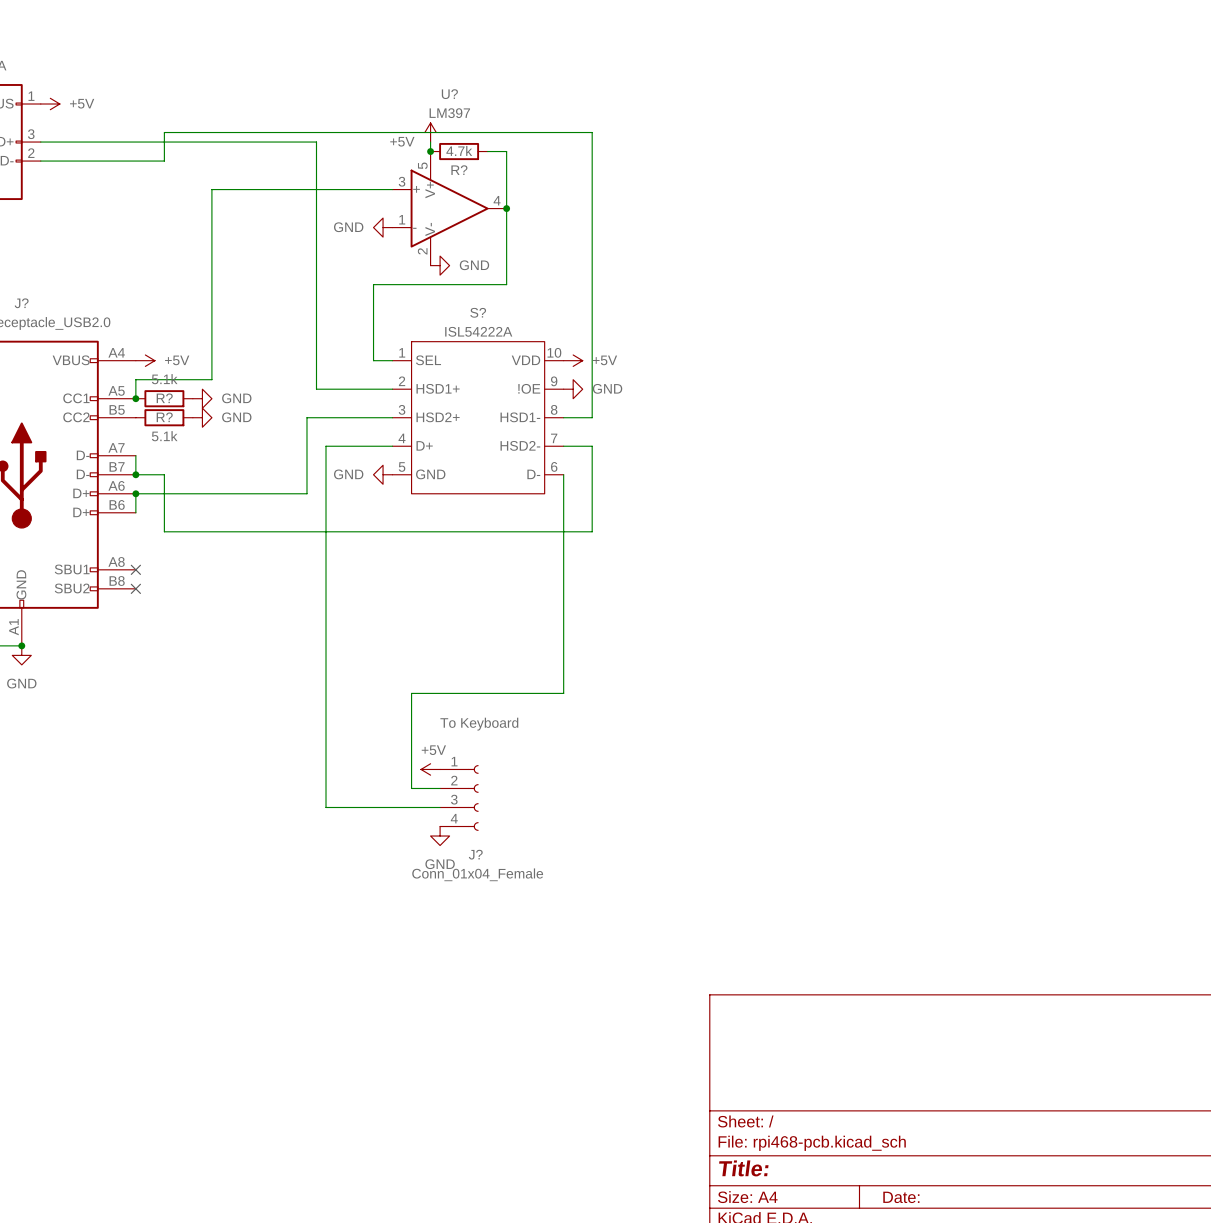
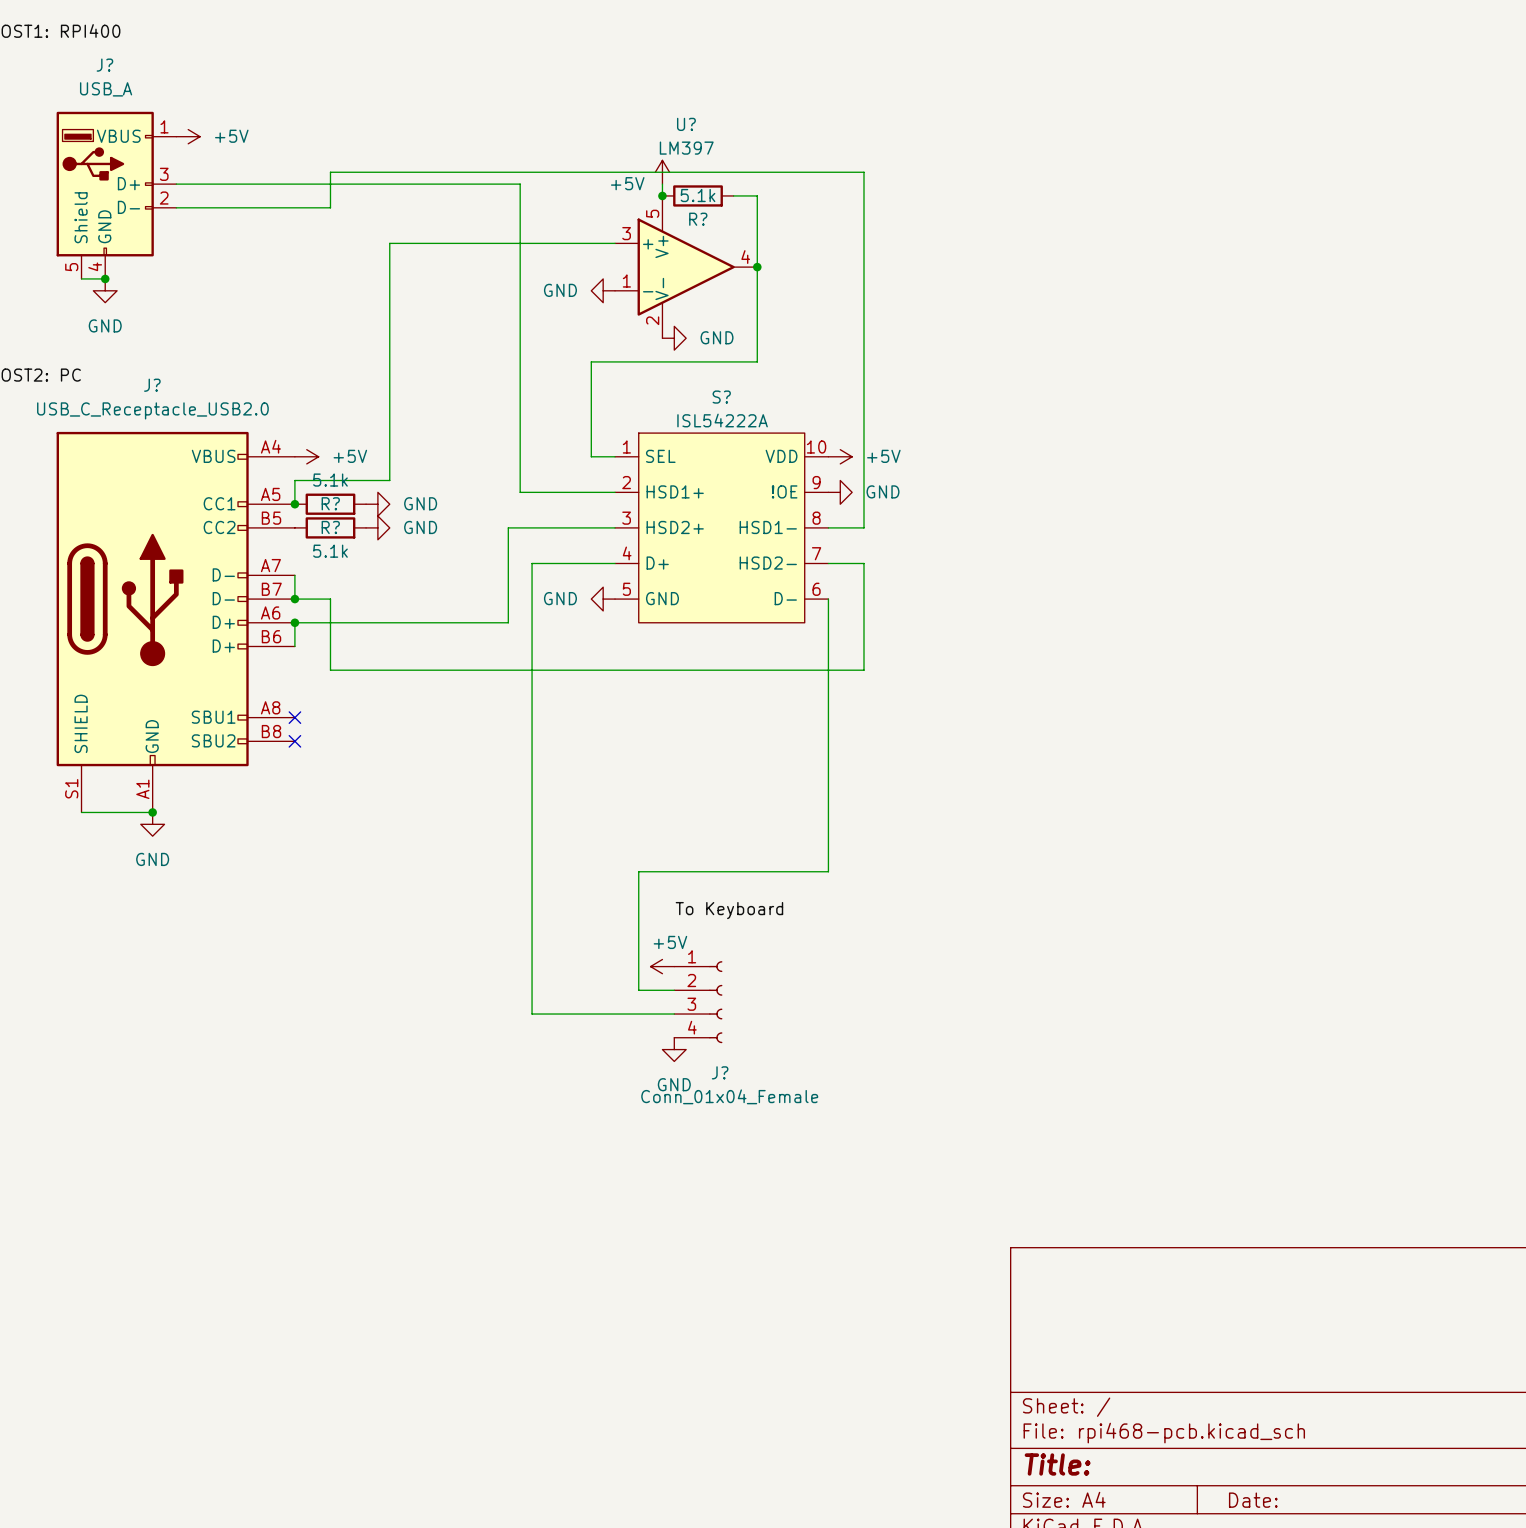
R? value: 4.7k (459, 150) -> 5.1k (698, 195)

